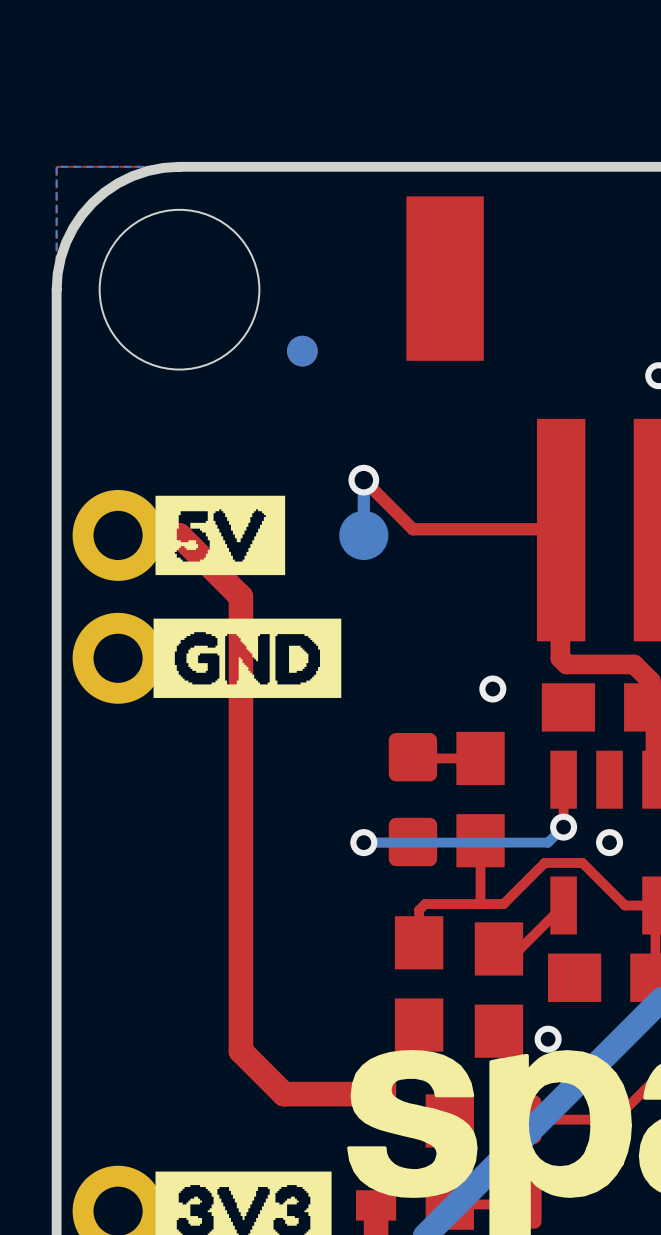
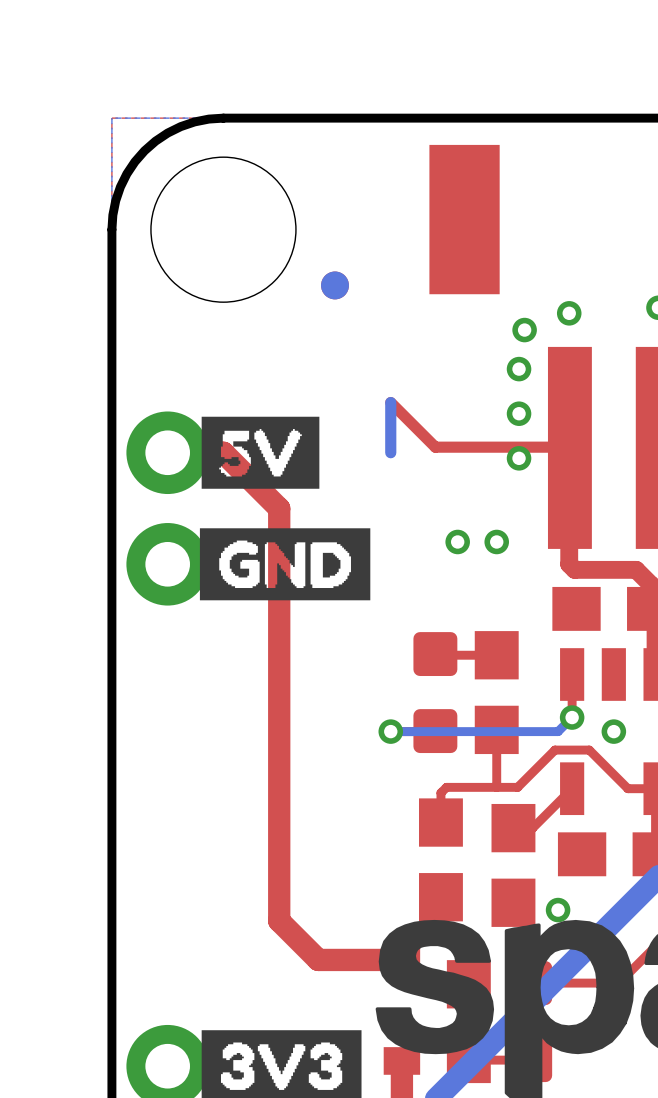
via: none -> (569, 313)
via: none -> (524, 330)
via: none -> (519, 369)
via: (363, 480) -> none
via: none -> (519, 413)
part: (363, 535) -> none
via: none -> (519, 458)
via: none -> (457, 541)
via: none -> (496, 541)
via: (492, 689) -> none

